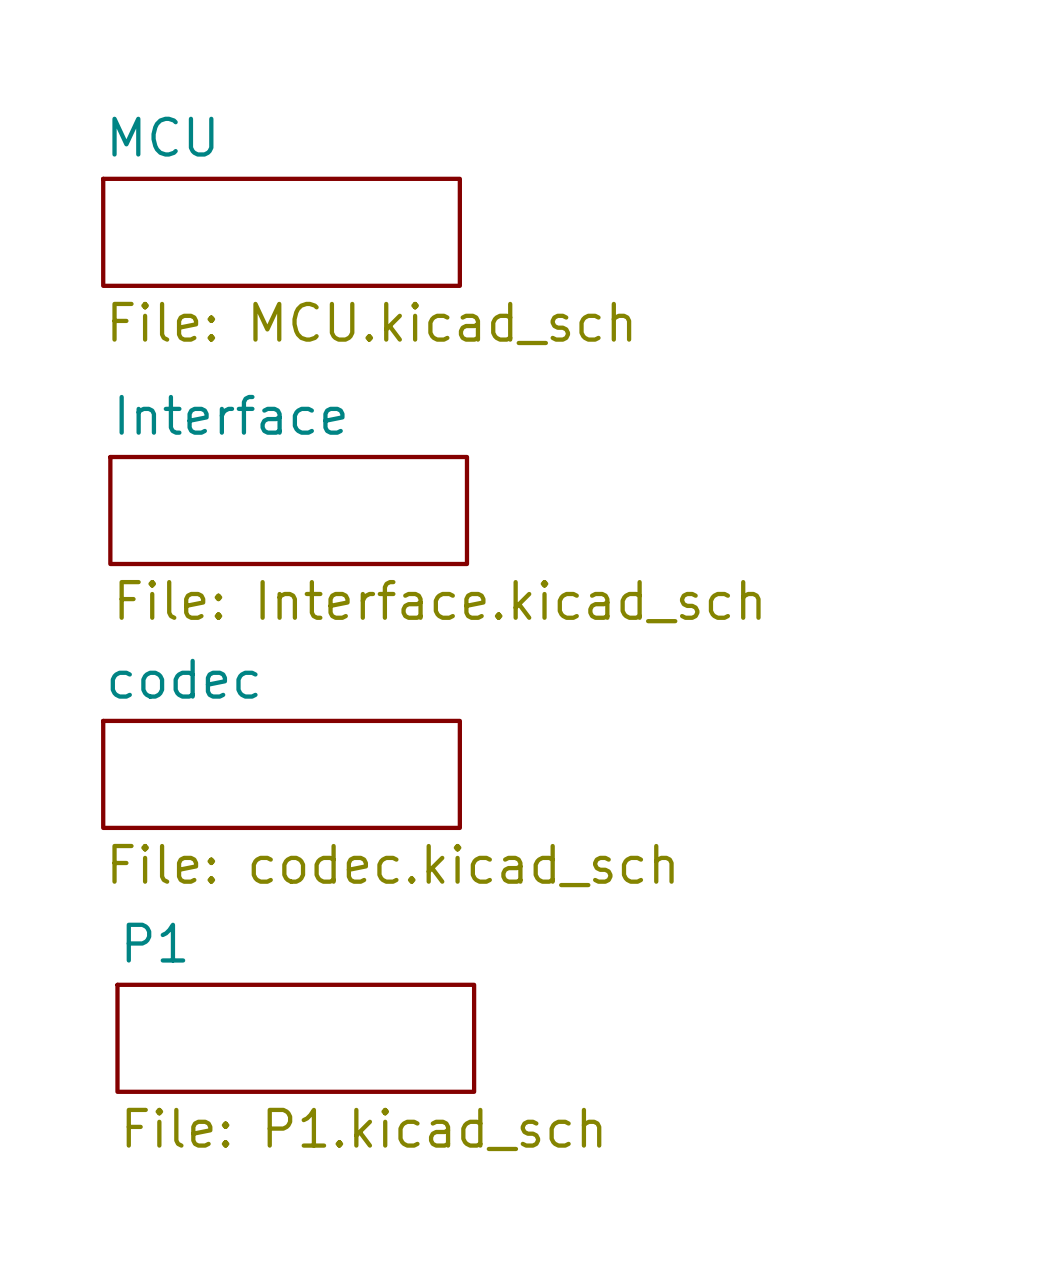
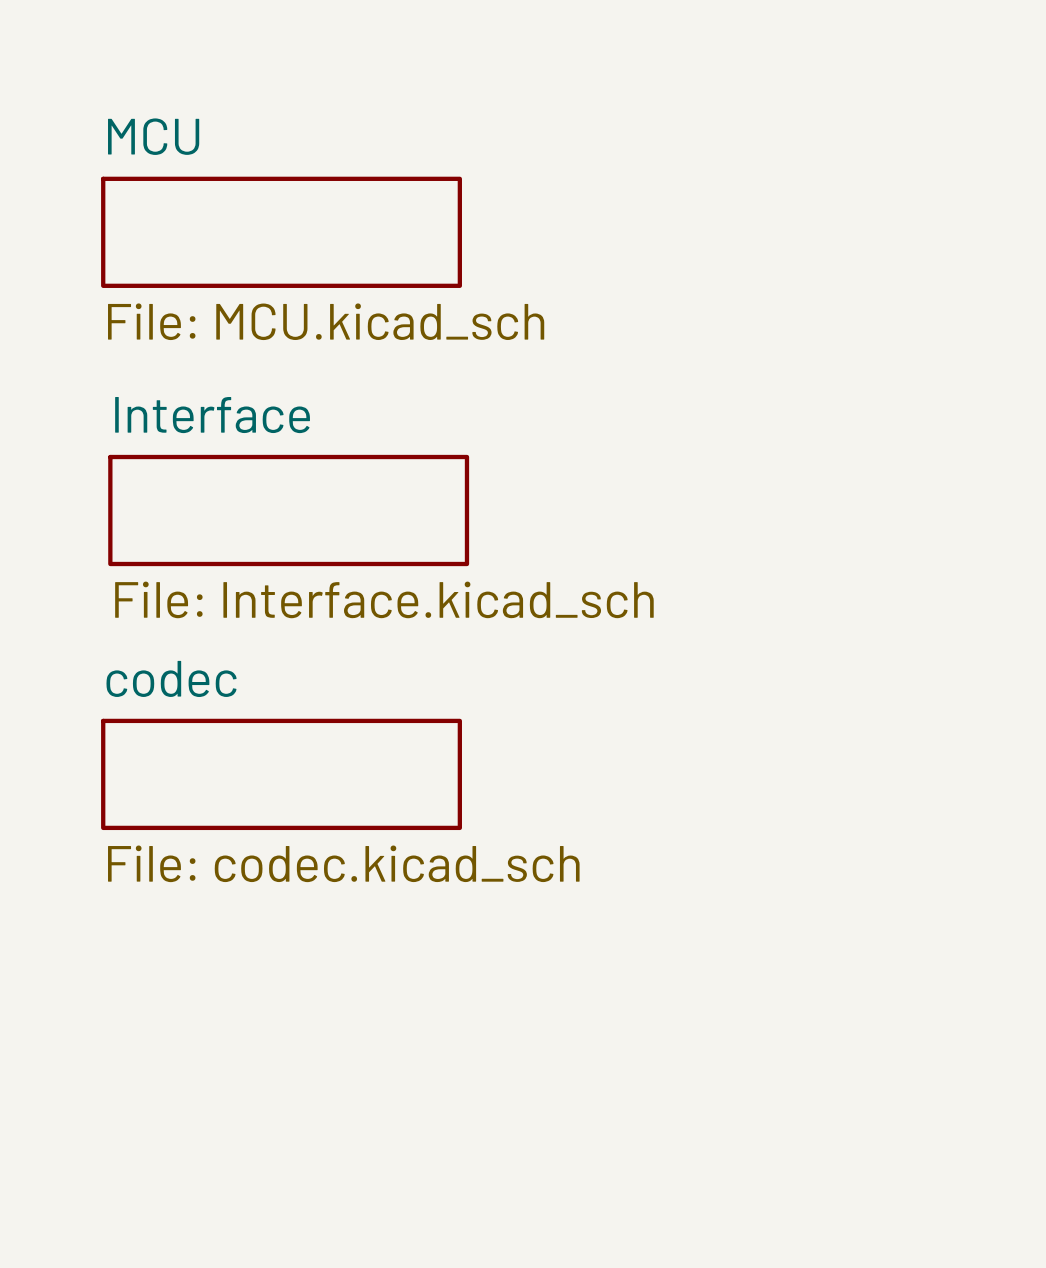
sheet P1: File: P1.kicad_sch (295, 1038) -> none

